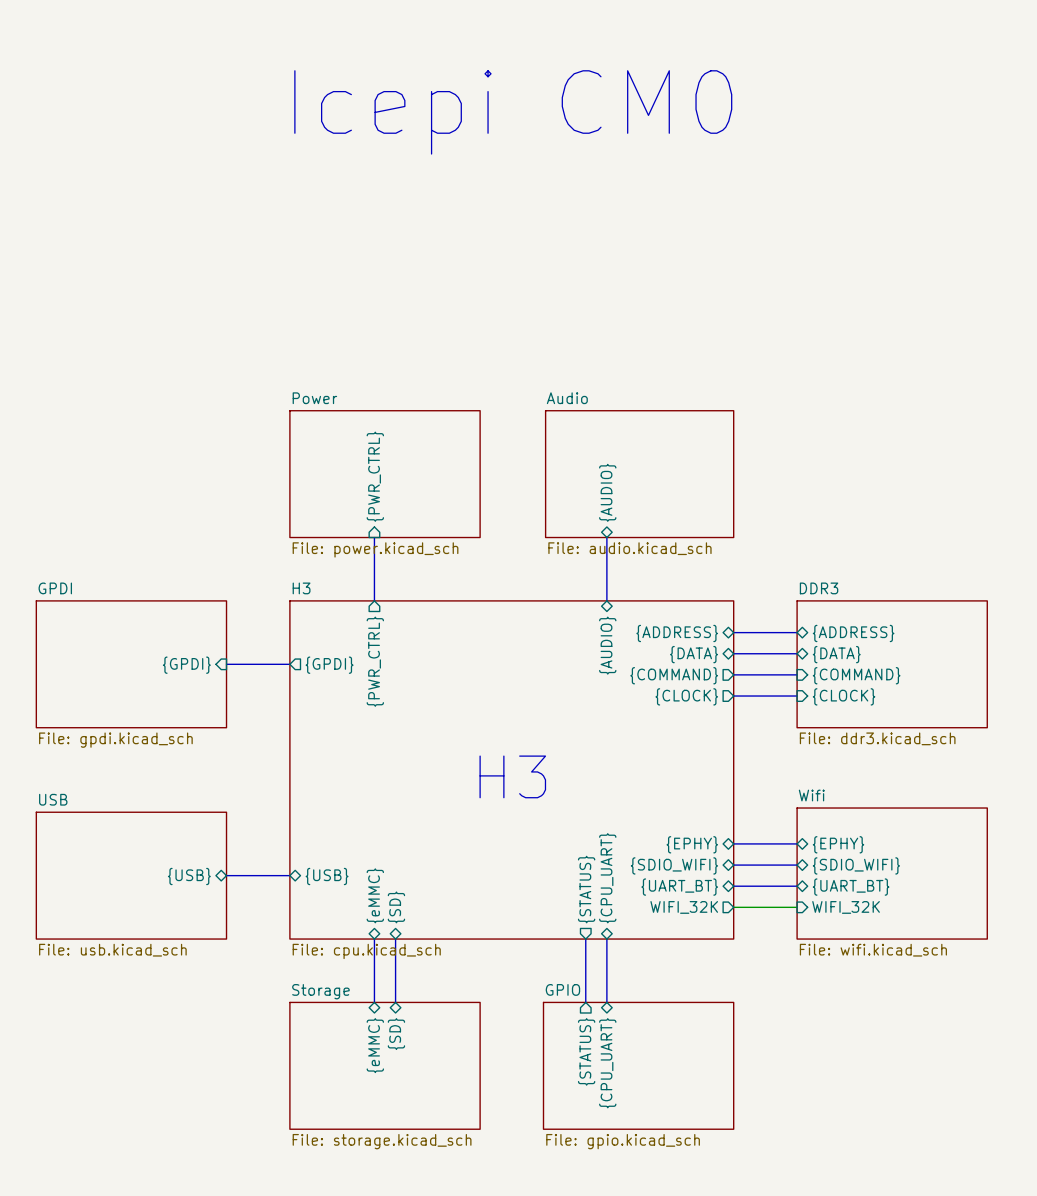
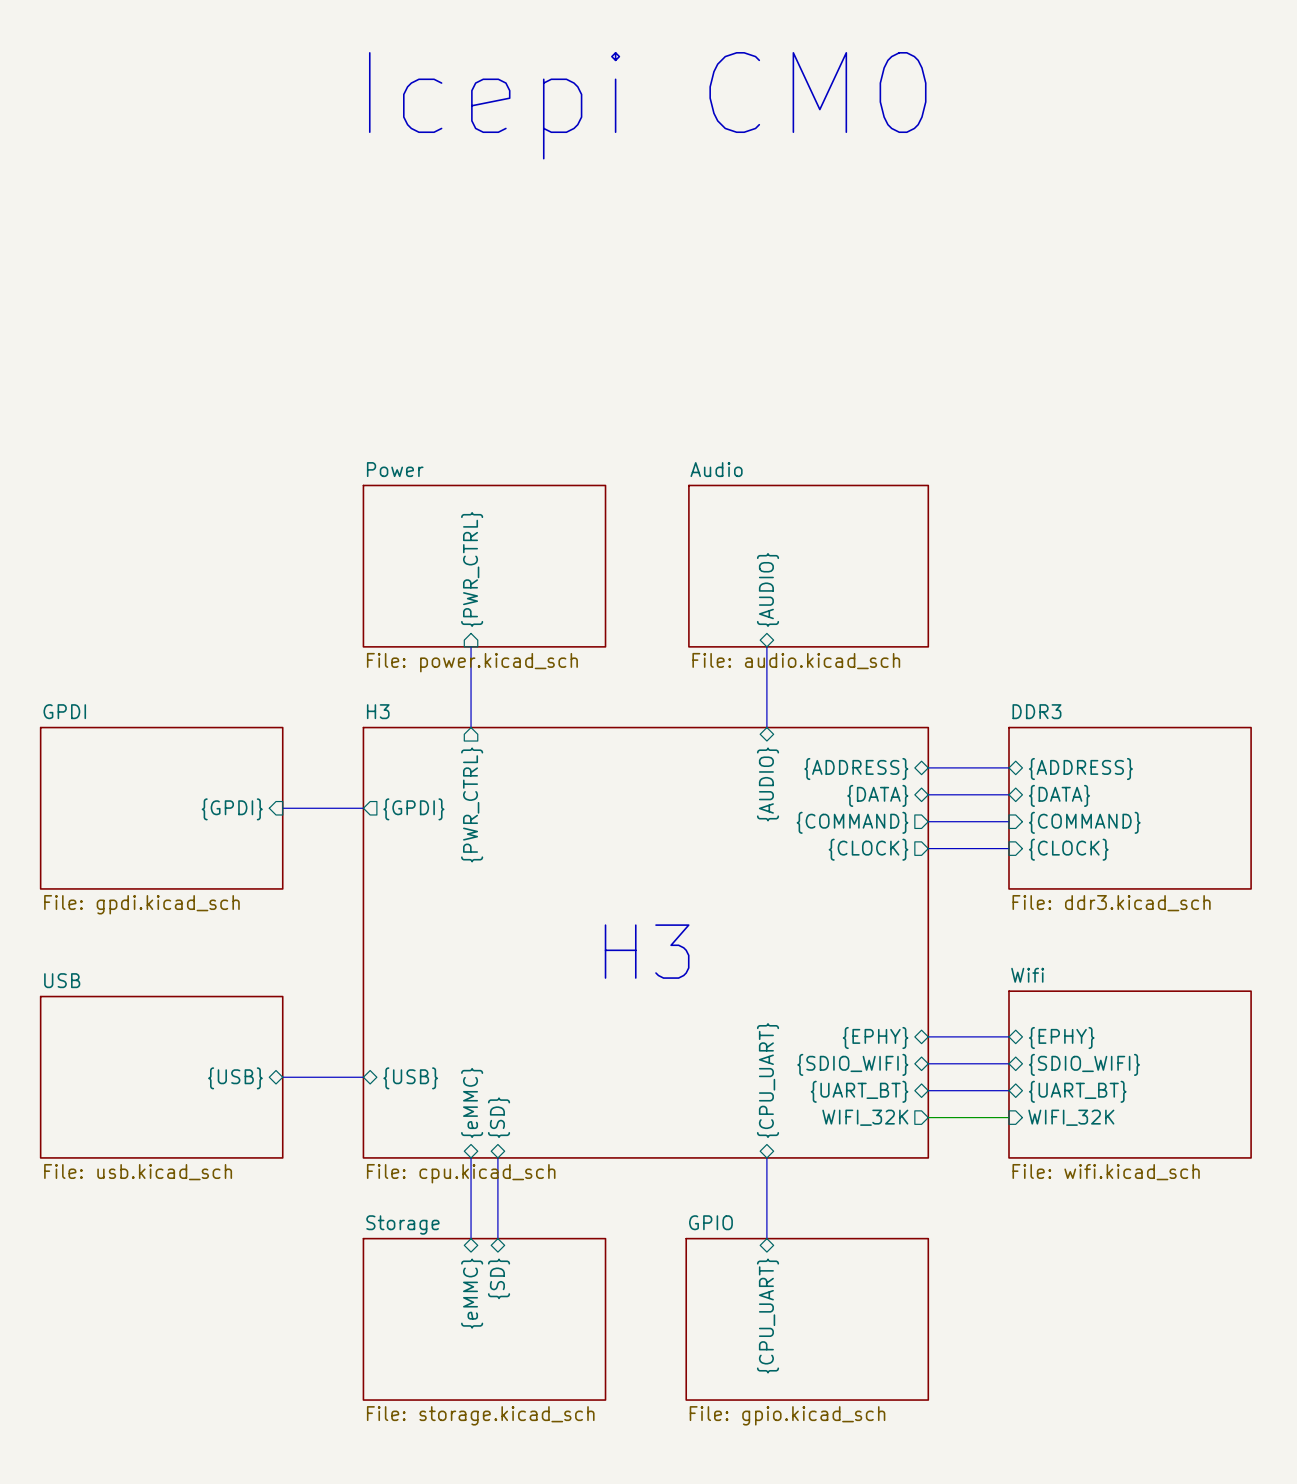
sheet pin: {STATUS} (586, 889) -> none
bus: (585, 939) (585, 1002) -> none
sheet pin: {STATUS} (586, 1051) -> none

